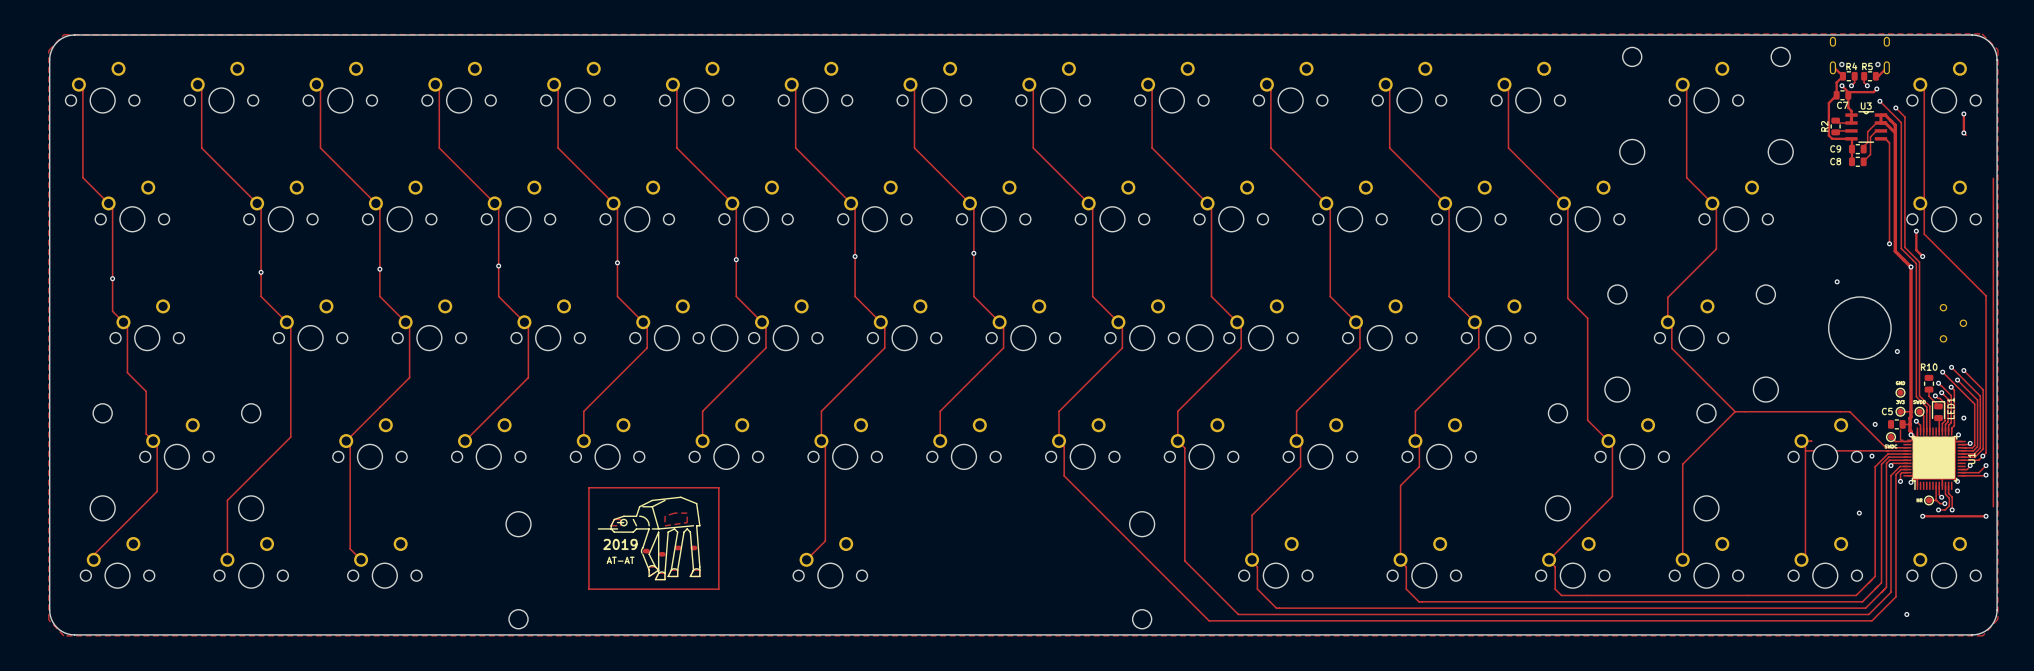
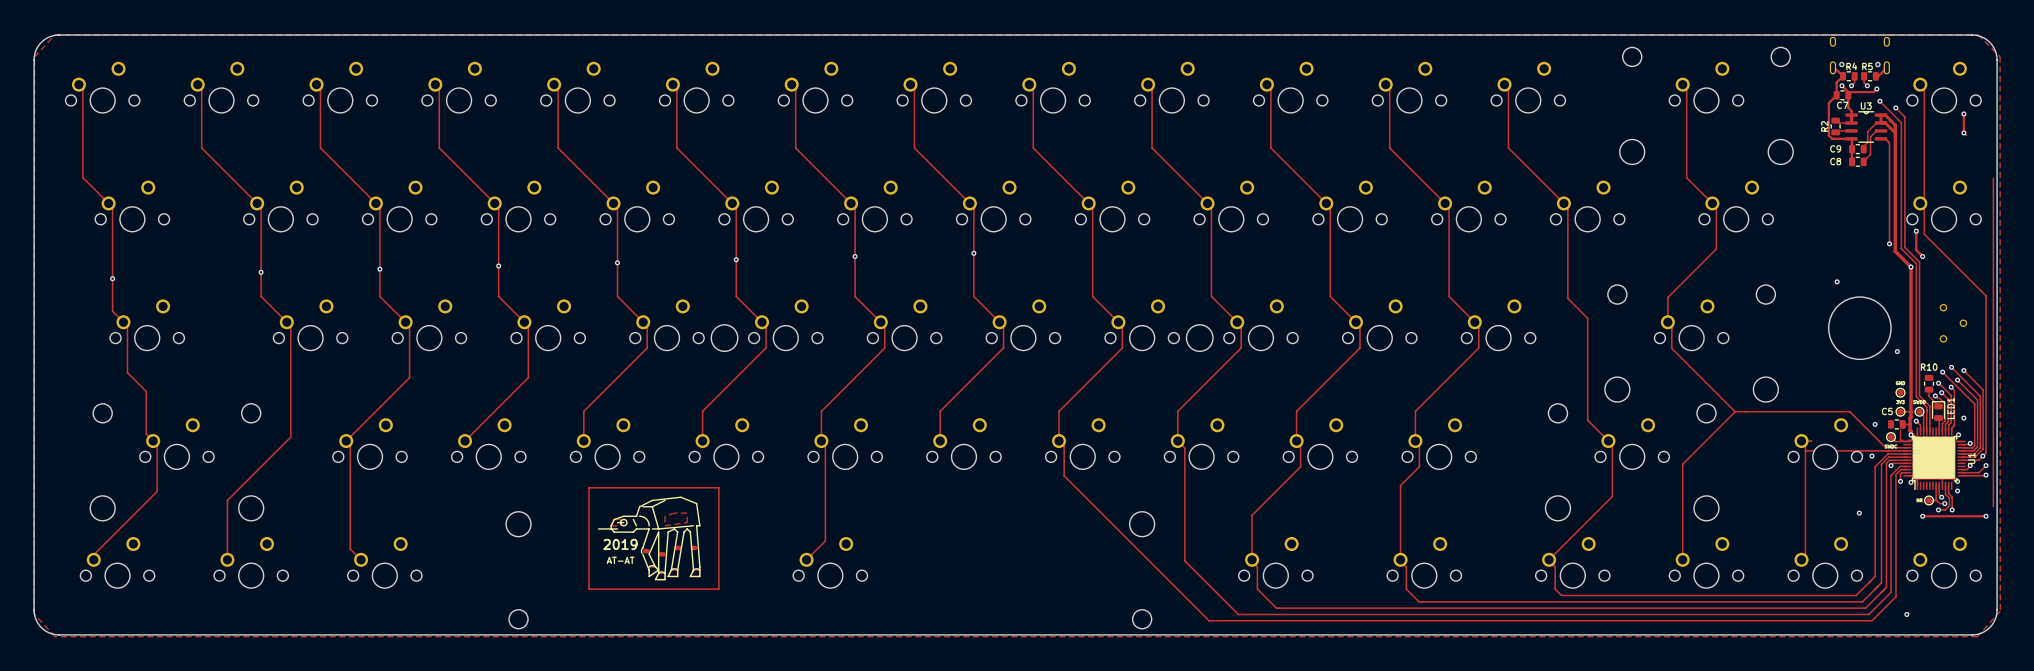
zone outline: (1982, 33) (63, 34) (48, 50) (48, 620) (63, 635) (1982, 635) (1997, 619) (1997, 49) (1982, 33) -> (55, 34) (34, 56) (33, 613) (55, 636) (1977, 636) (2000, 611) (2000, 56) (1978, 34) (55, 34)
board edge: (74, 35) (63, 37) (56, 42) (52, 49) (49, 59) (49, 609) (51, 619) (56, 627) (65, 633) (74, 634) -> (74, 35) (56, 35) (45, 38) (37, 46) (34, 59) (34, 613) (39, 625) (46, 631) (55, 634) (74, 634)

